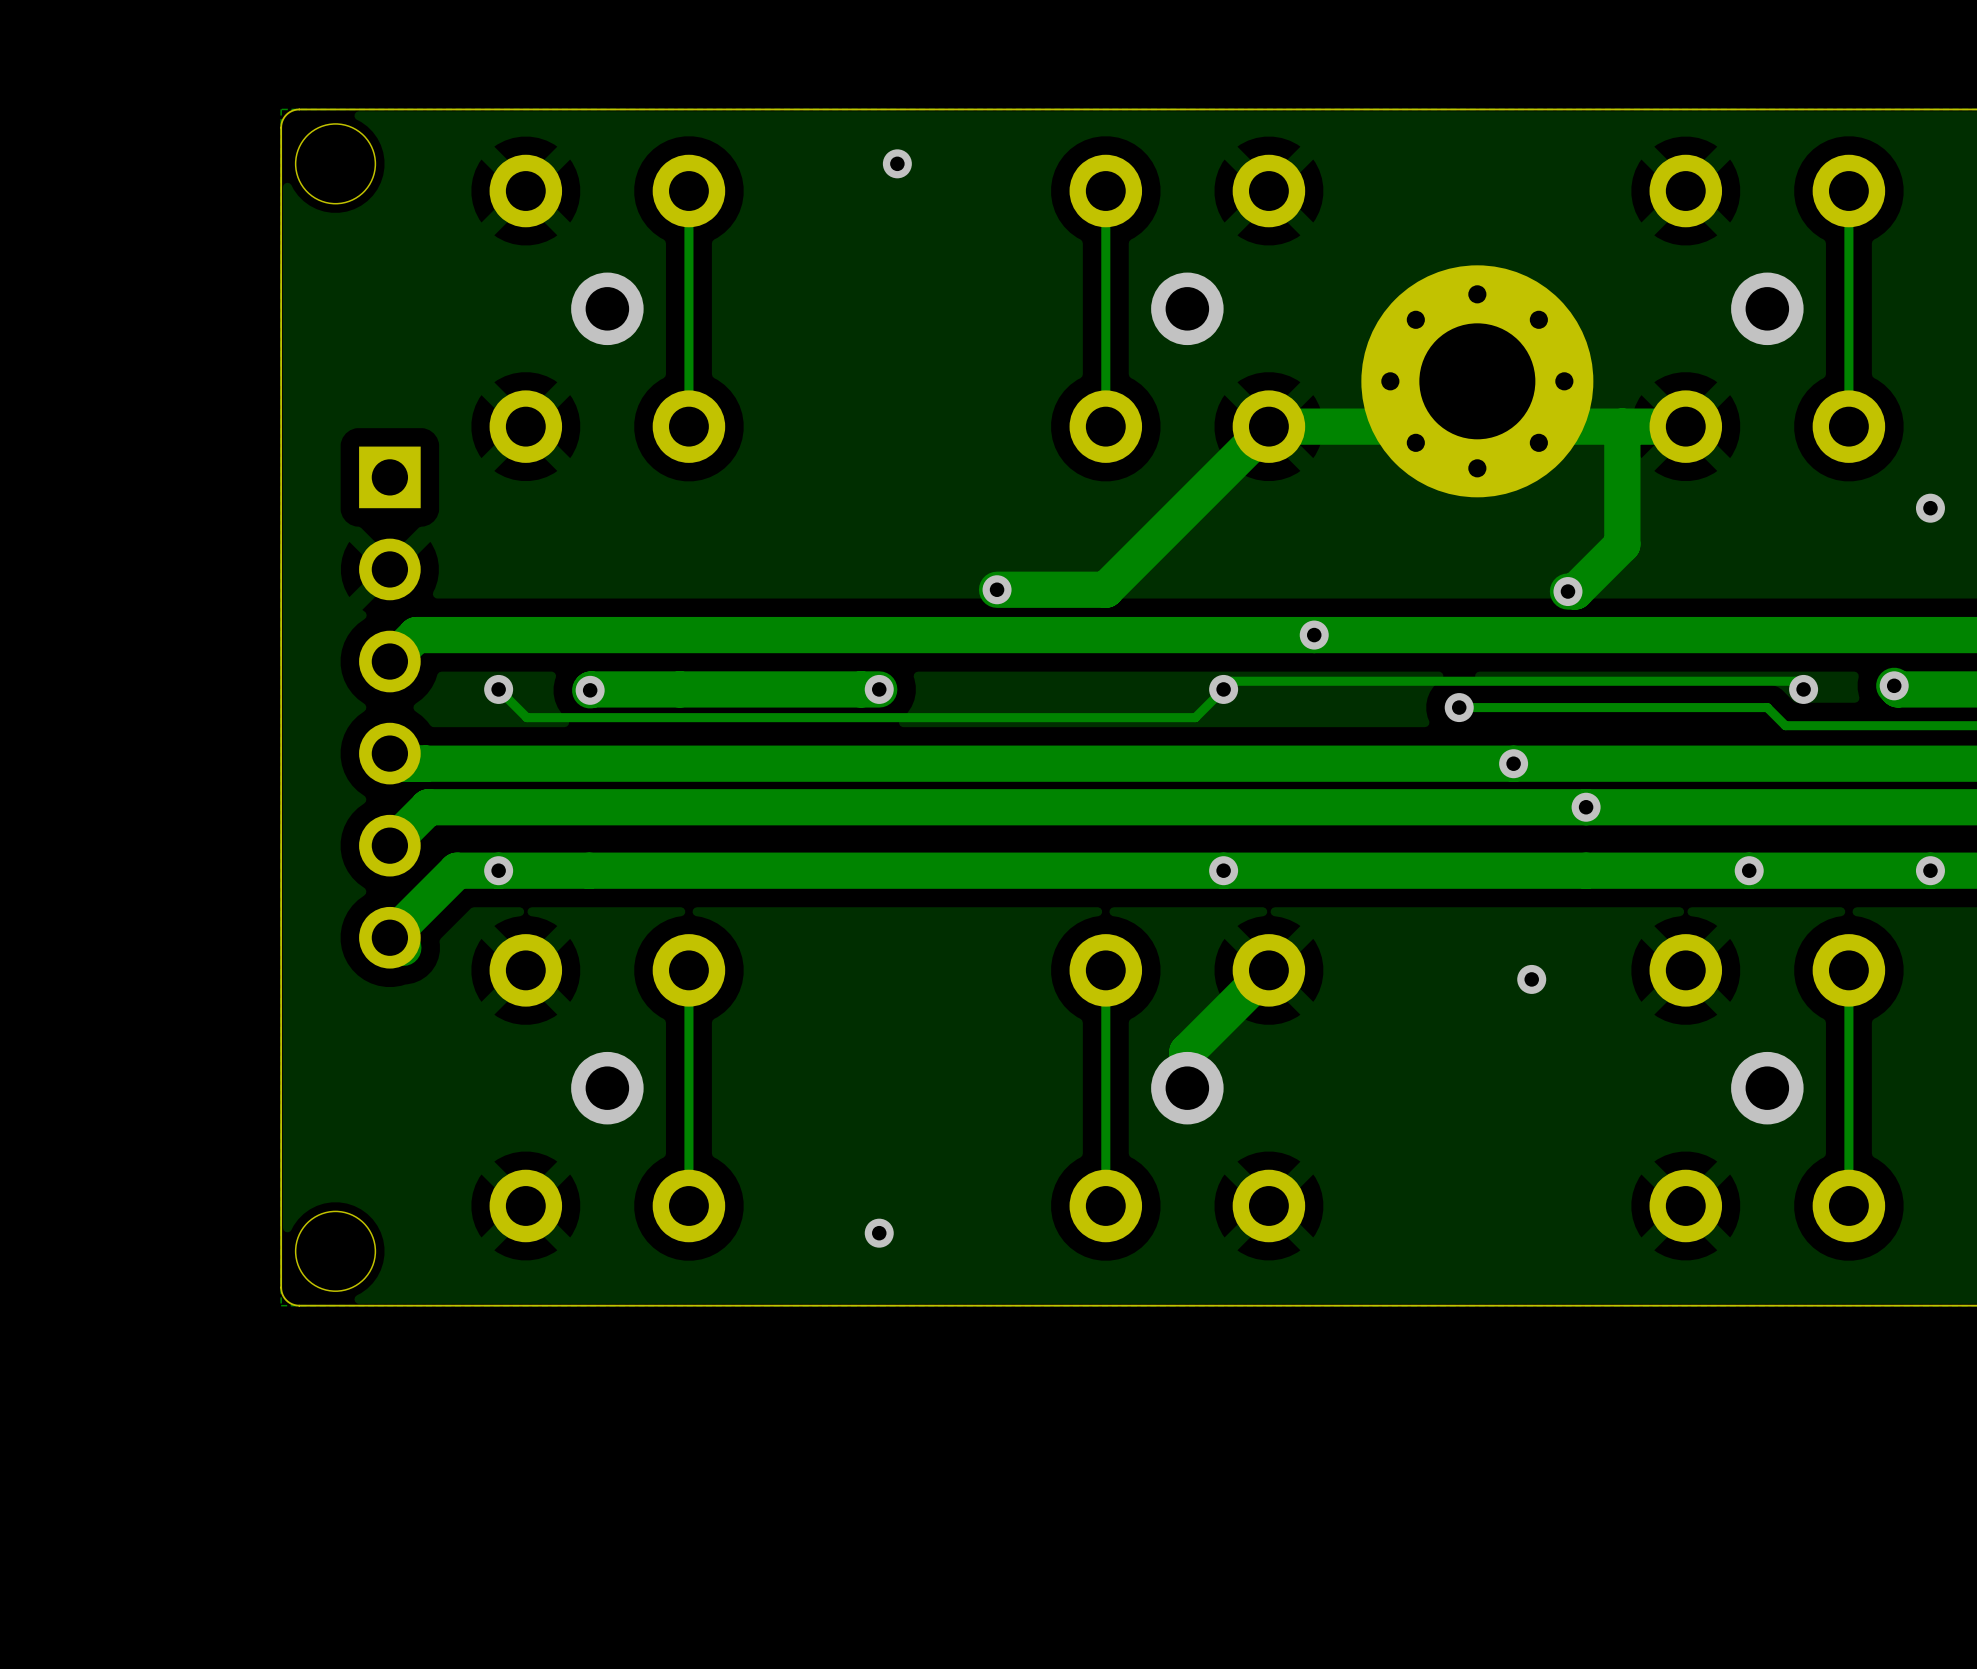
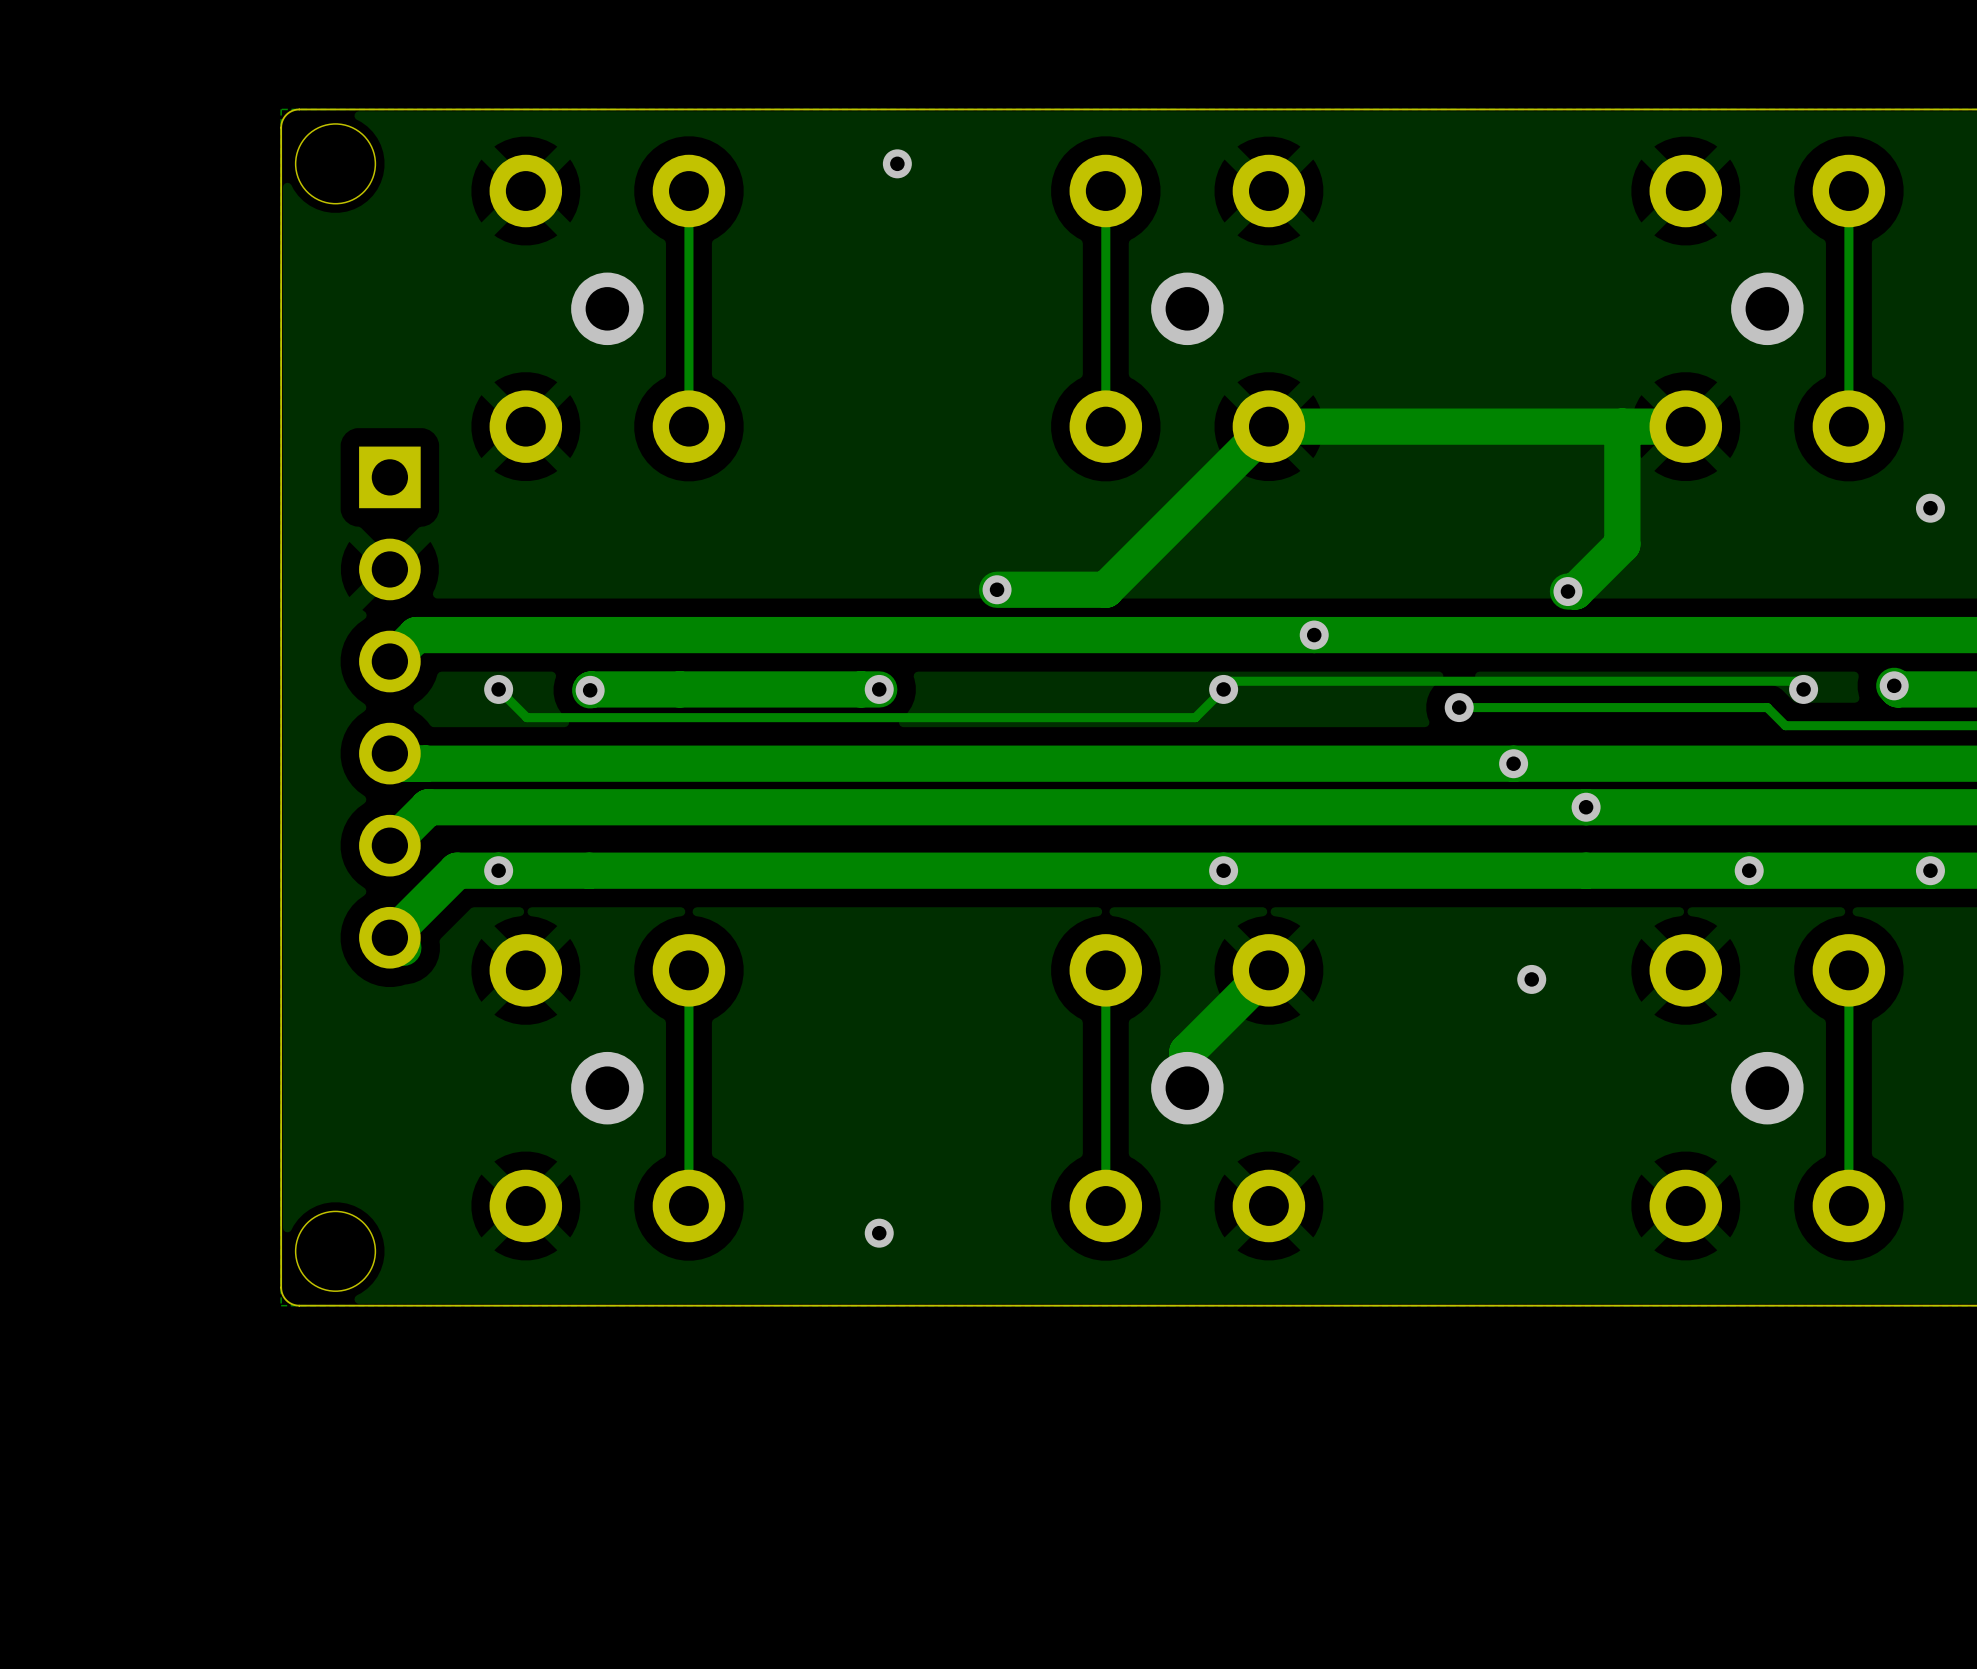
part: (1477, 381) -> none

